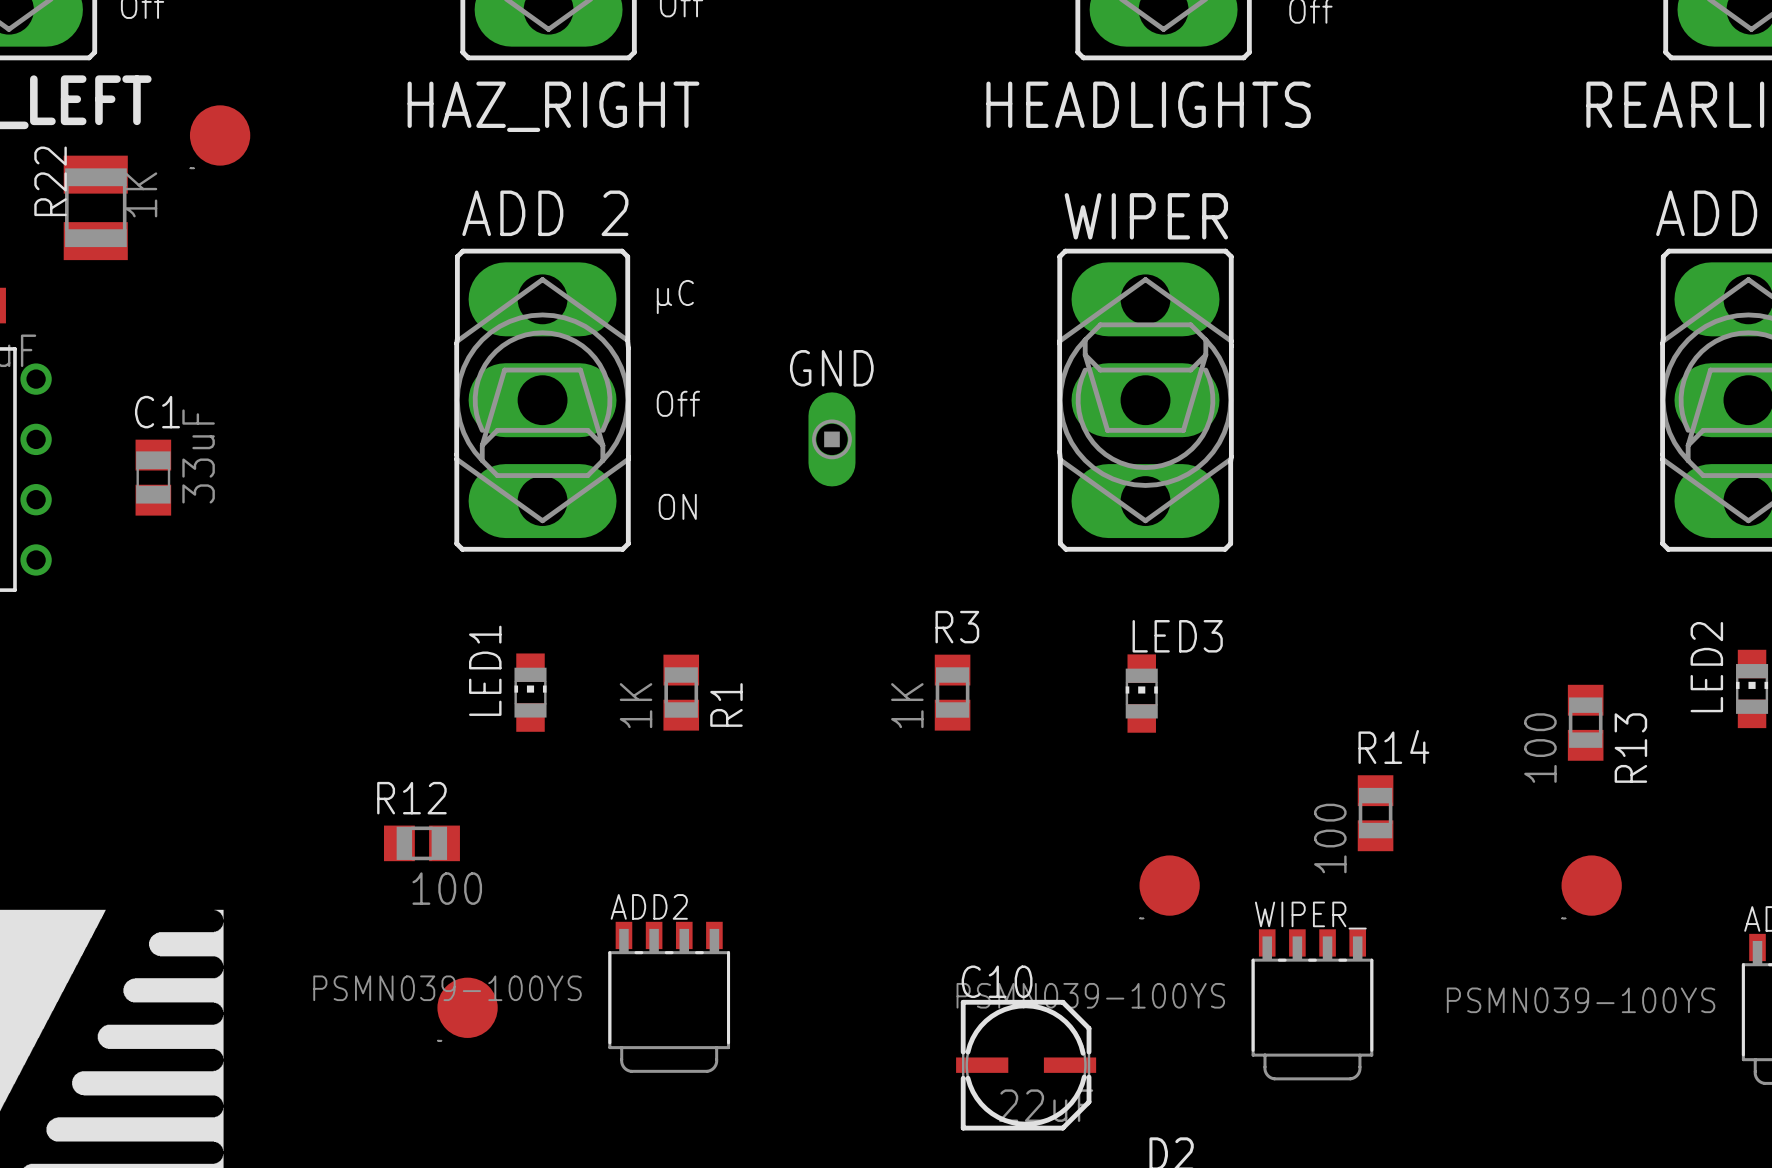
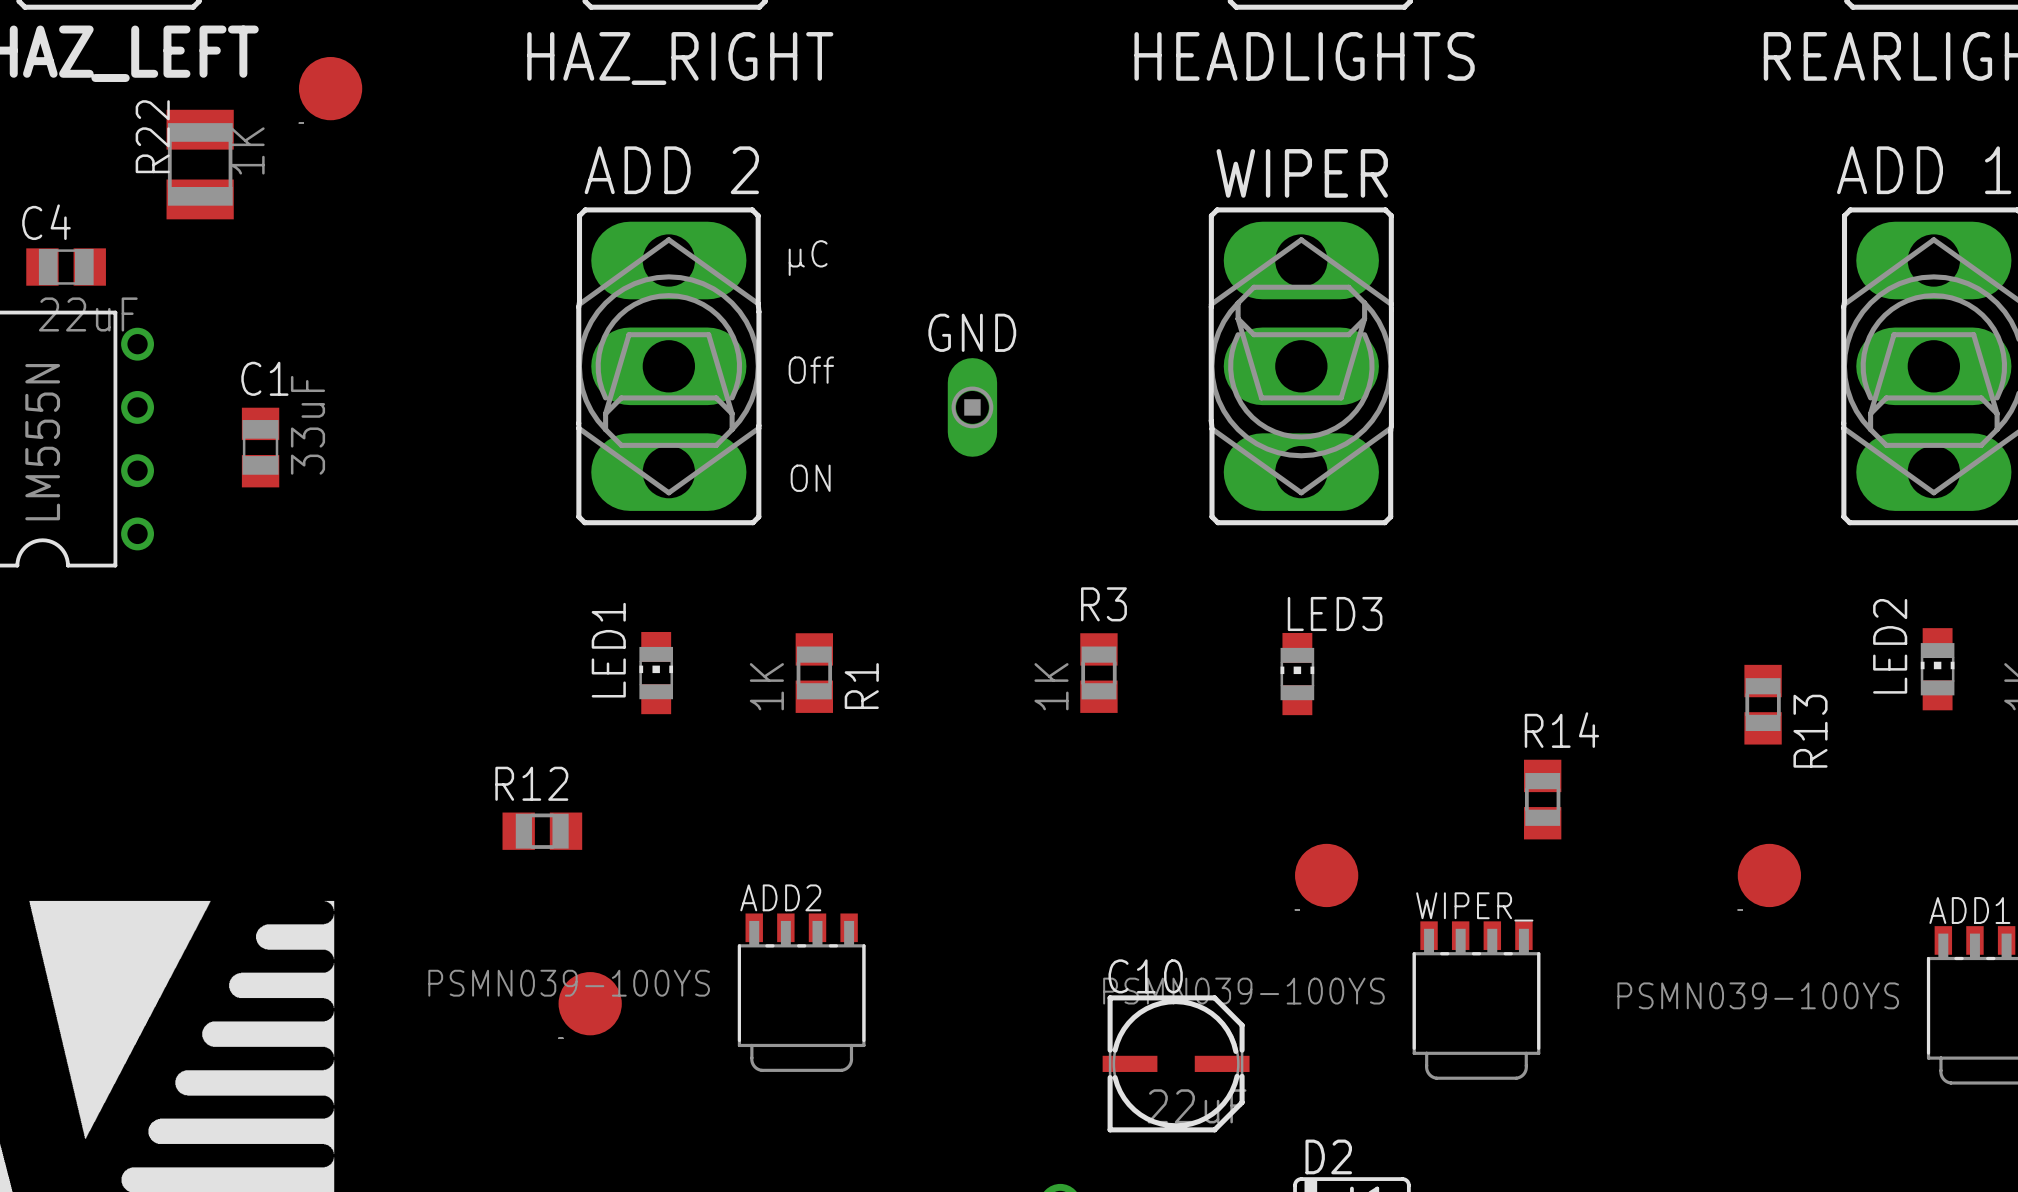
R13 value: 100 (1540, 748) -> none
R14 value: 100 (1330, 838) -> none
R12 value: 100 (447, 888) -> none

